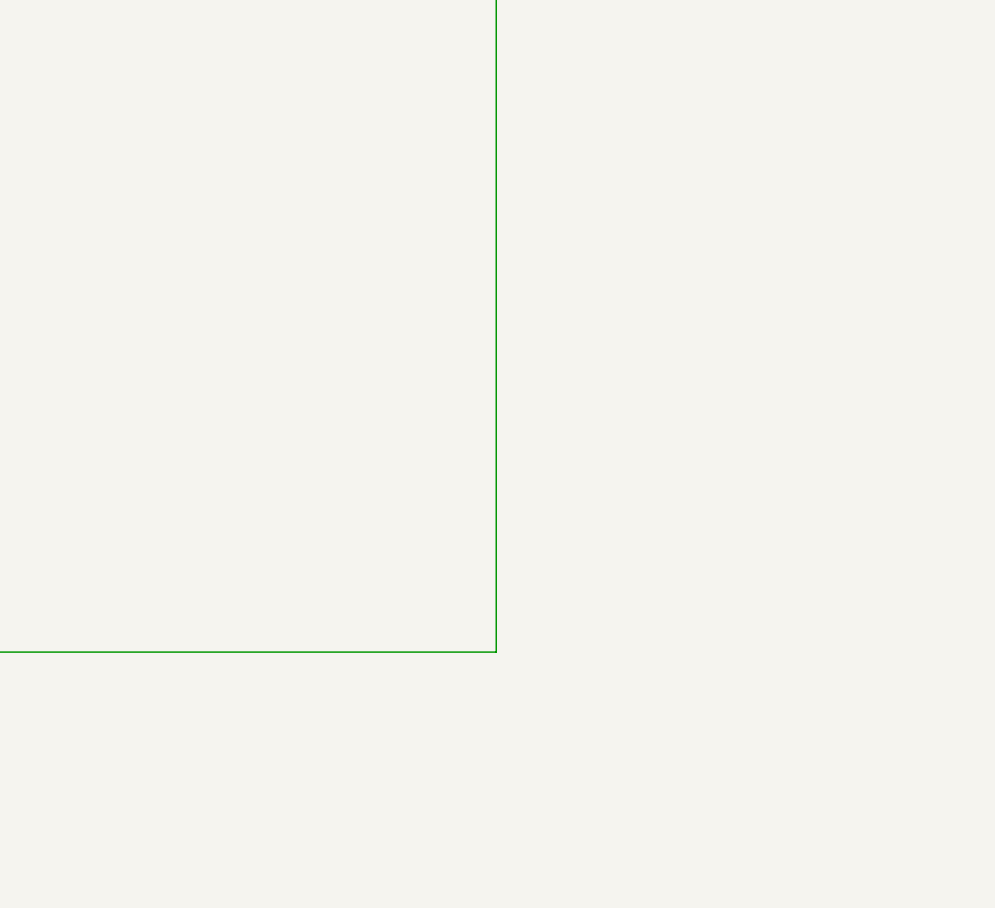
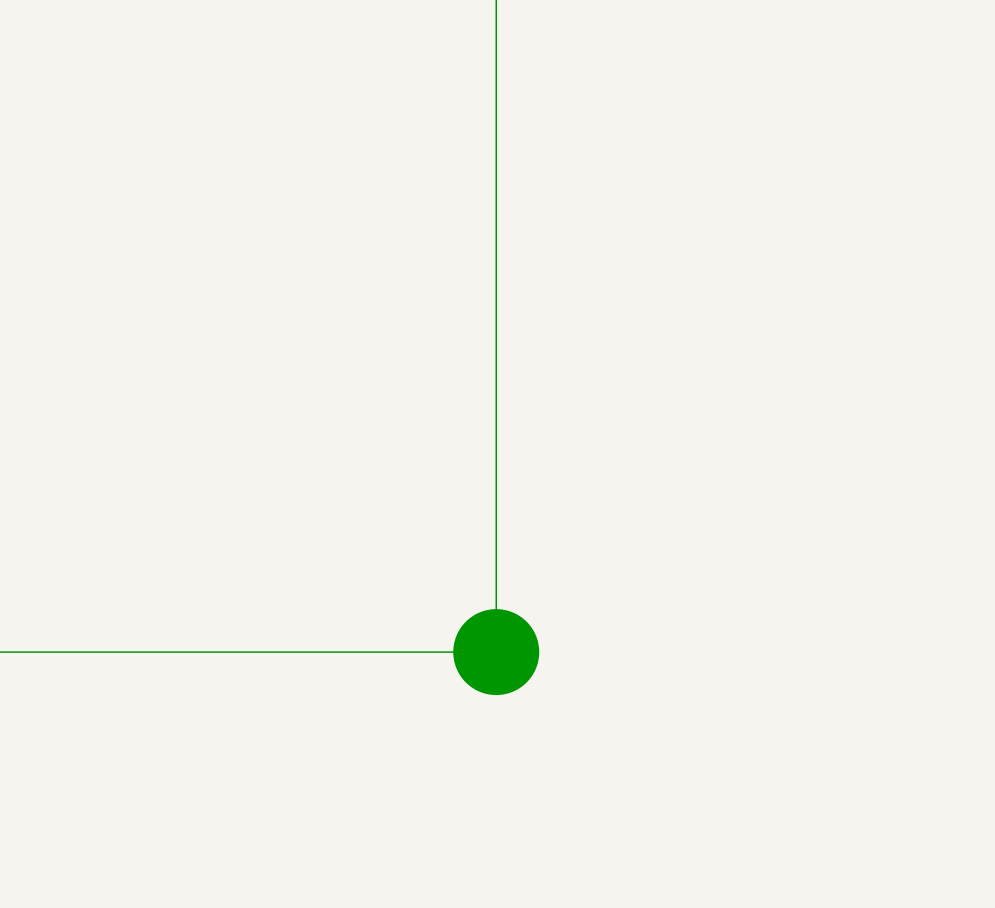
junction: none -> (496, 652)

